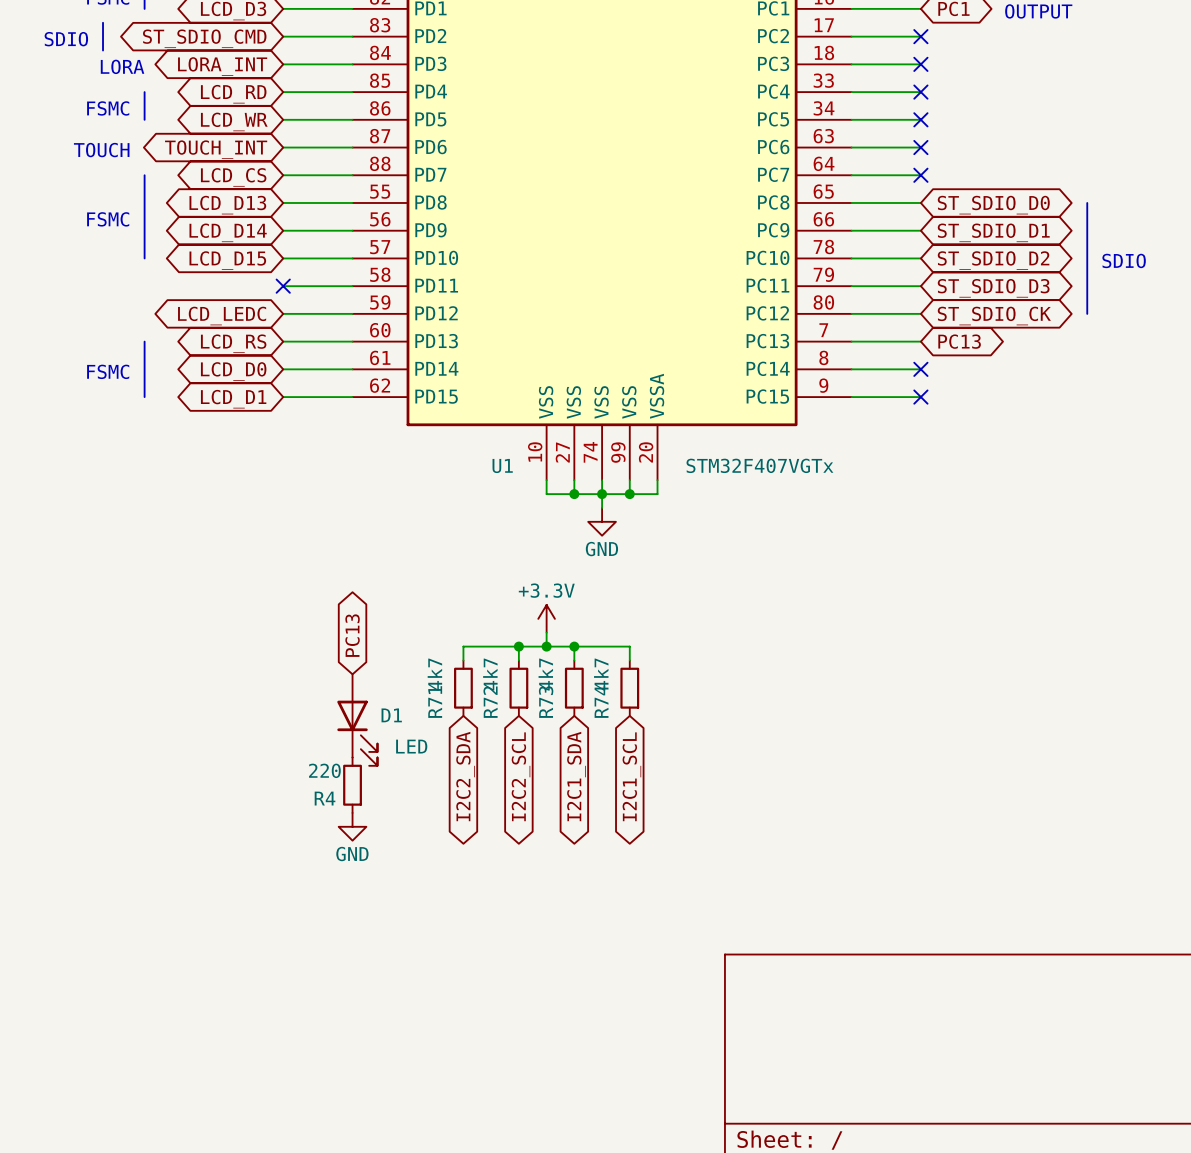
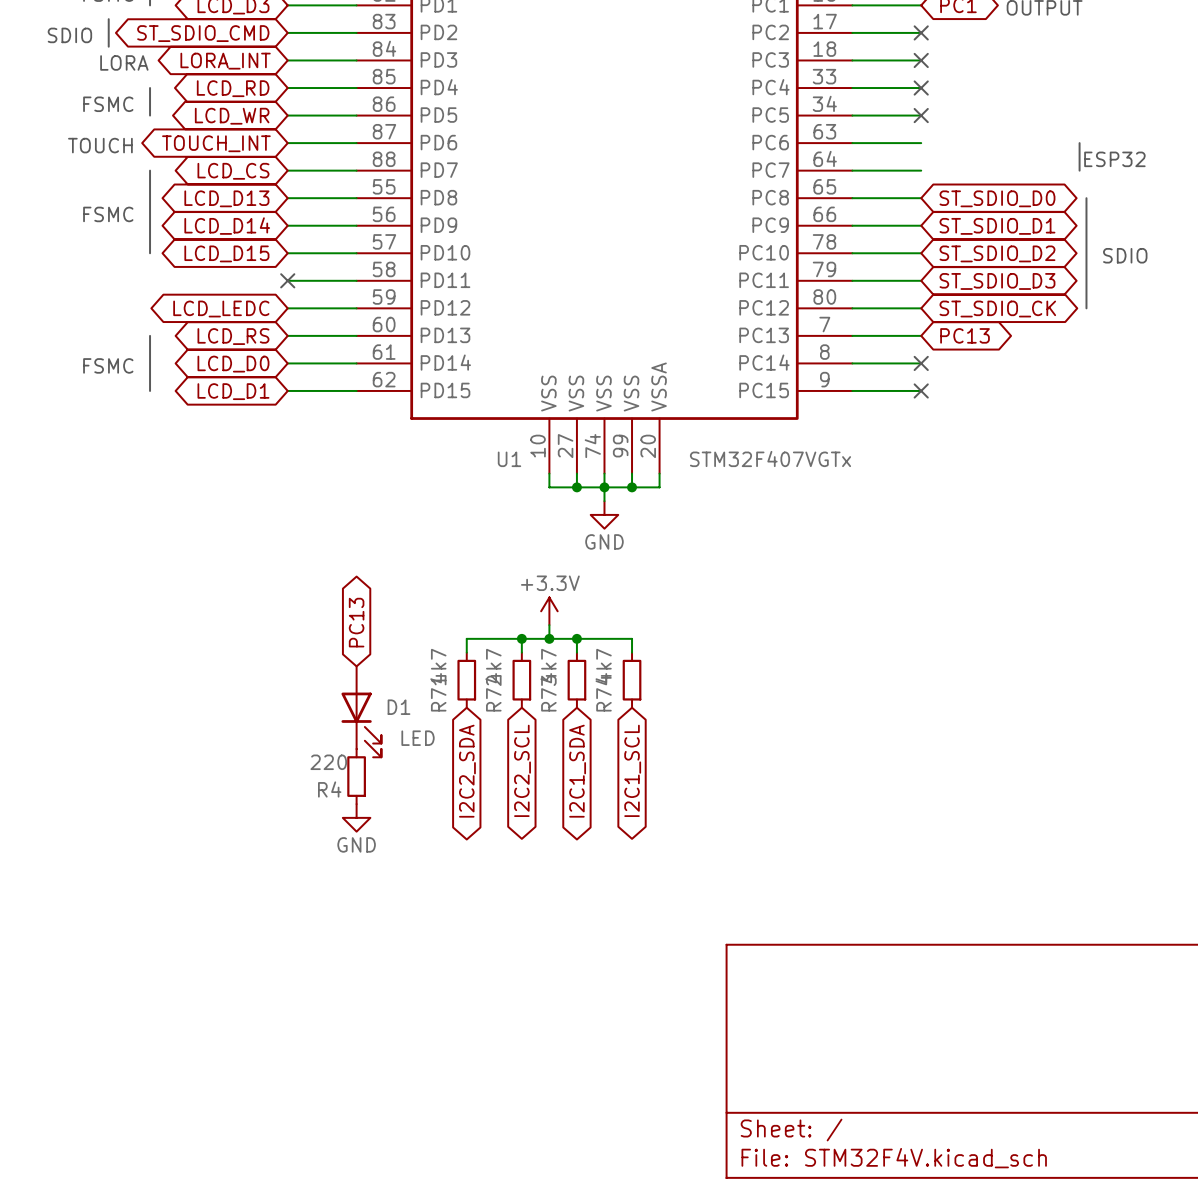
no-connect mark: (920, 147) -> none
bus: none -> (1079, 143) (1079, 170)
text: none -> ESP32 (1114, 159)
no-connect mark: (920, 175) -> none

